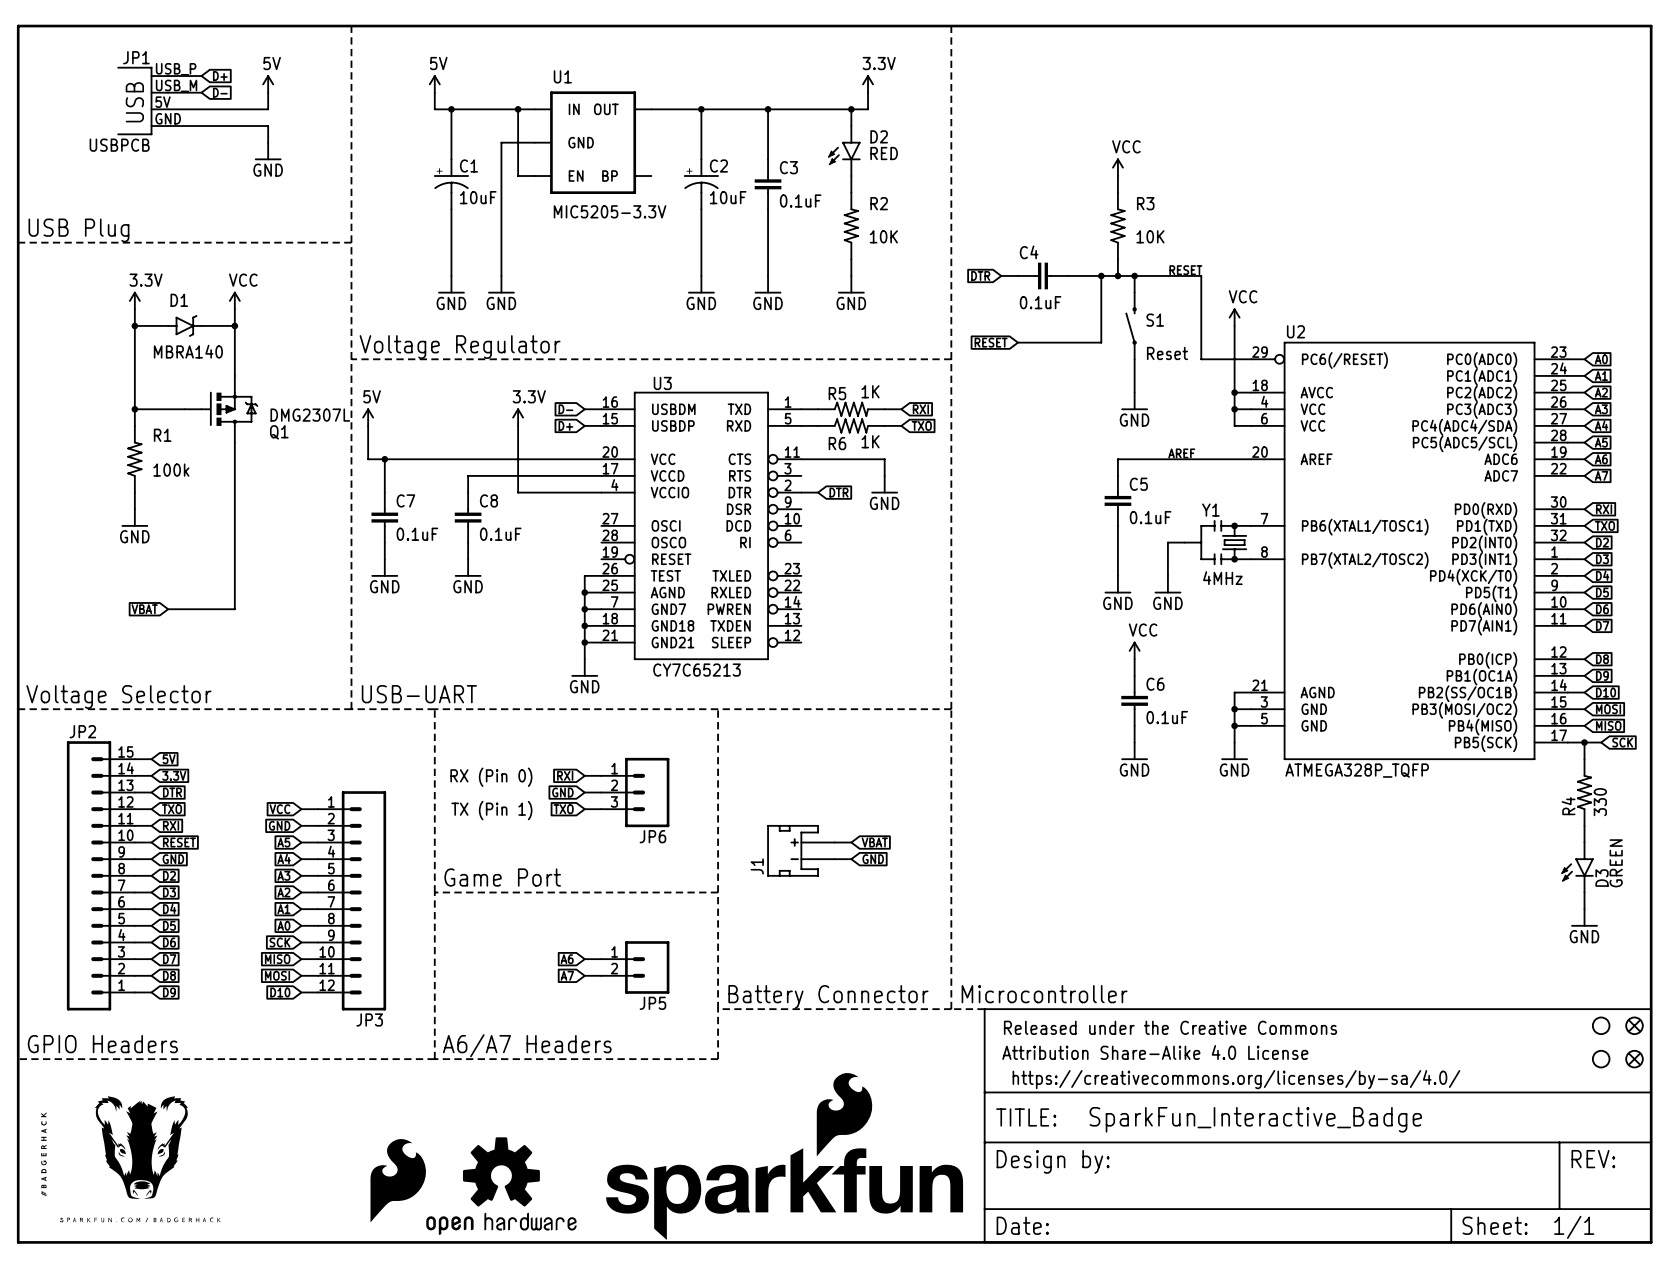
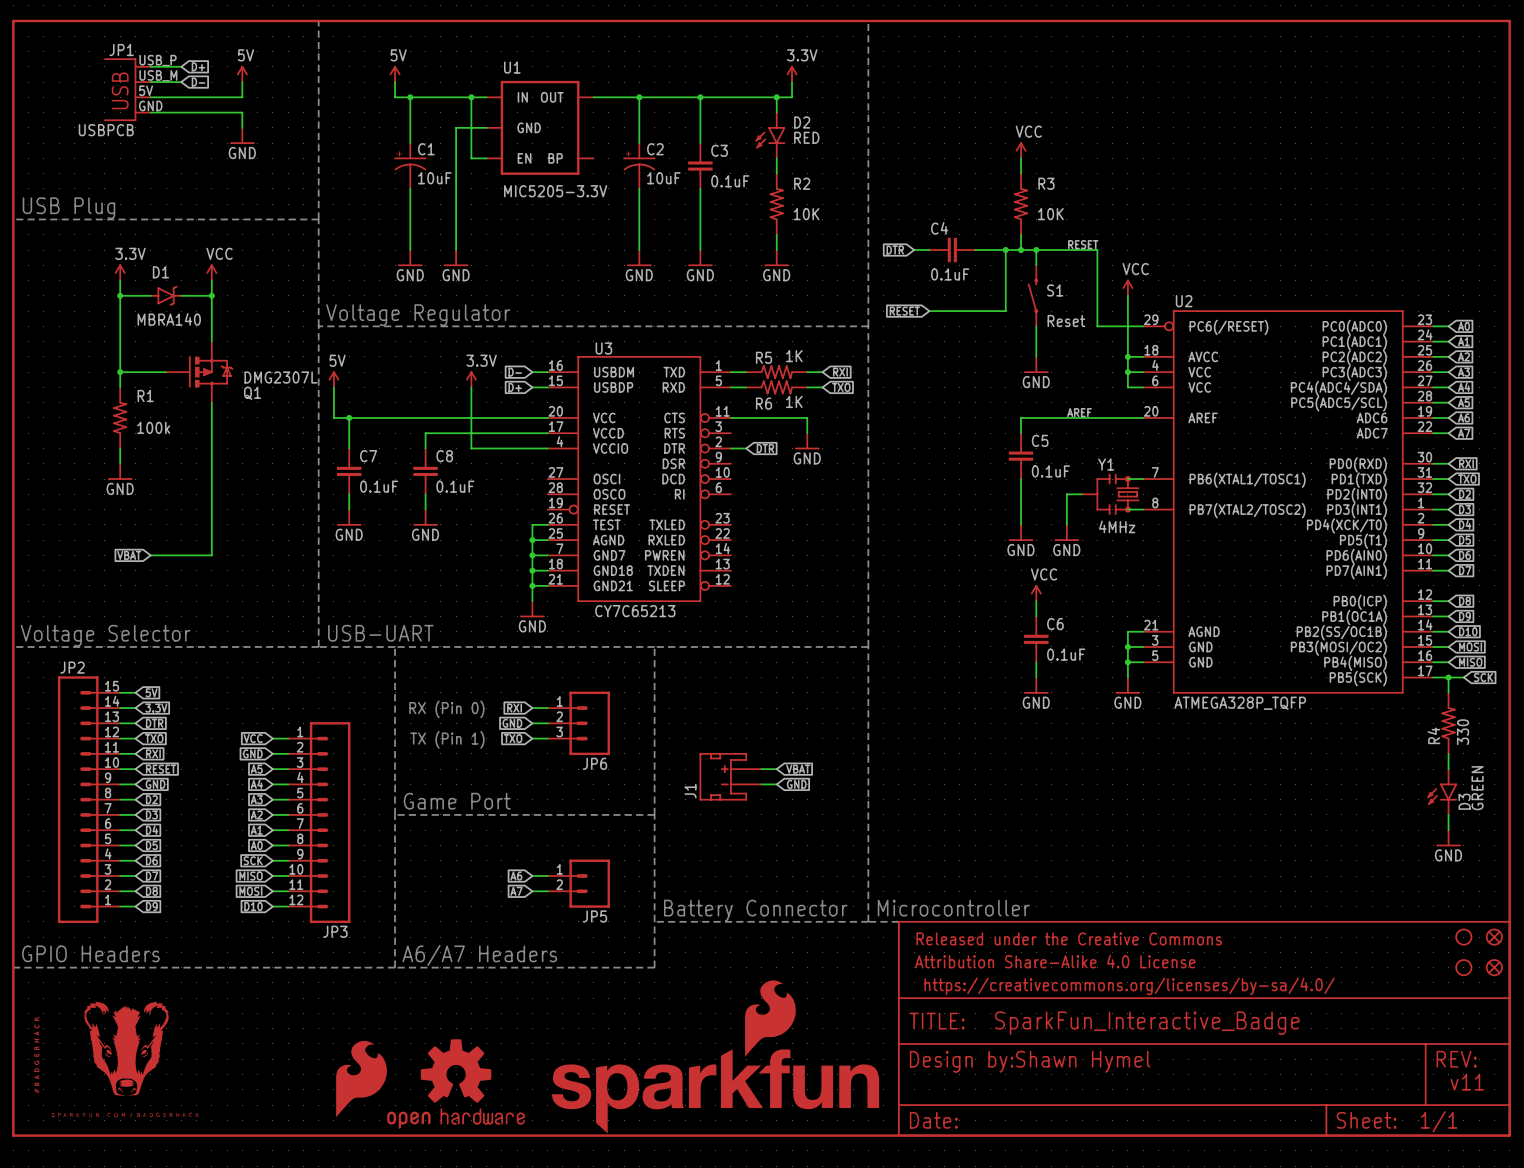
part text: none -> Shawn Hymel (1083, 1061)
part text: none -> v11 (1467, 1082)

